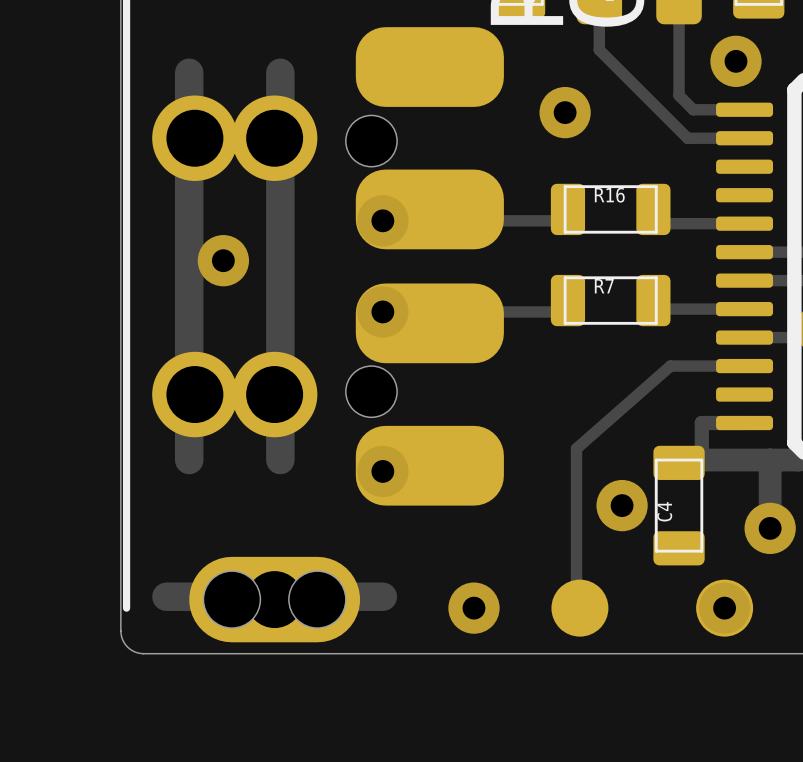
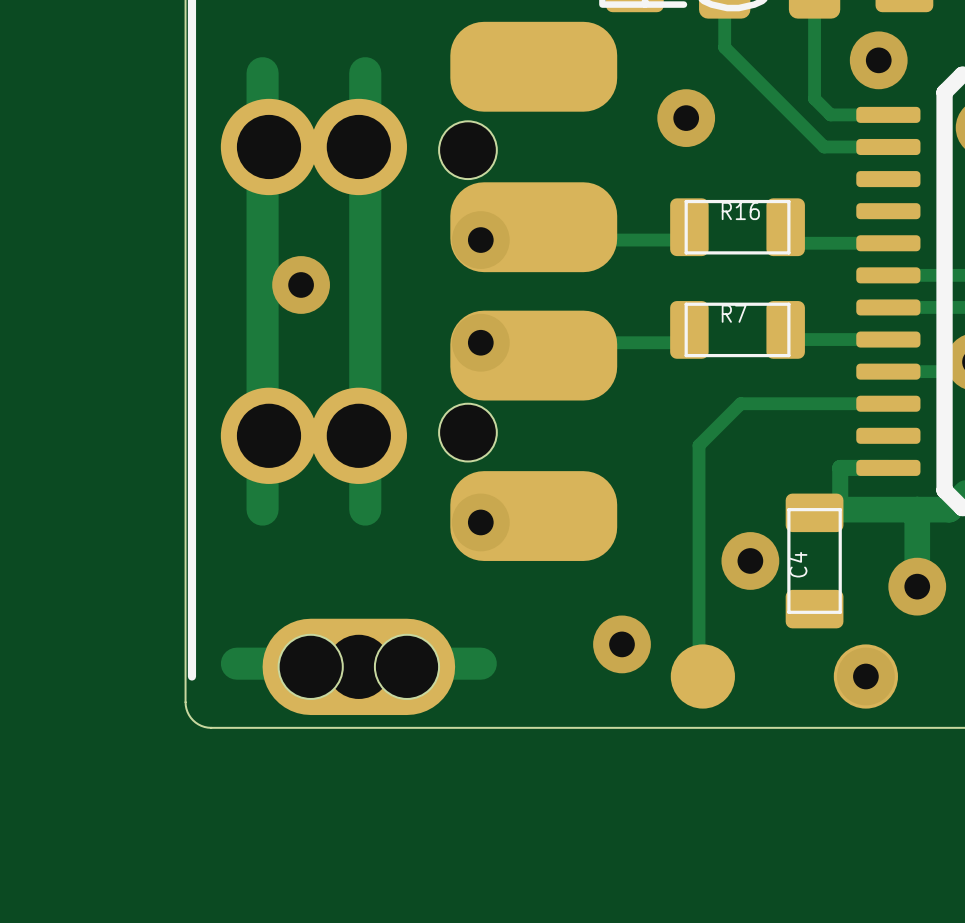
track: (670, 366) (576, 448) -> (804, 403) (740, 403) (699, 445) (699, 496)
via position: (473, 608) -> (622, 644)

